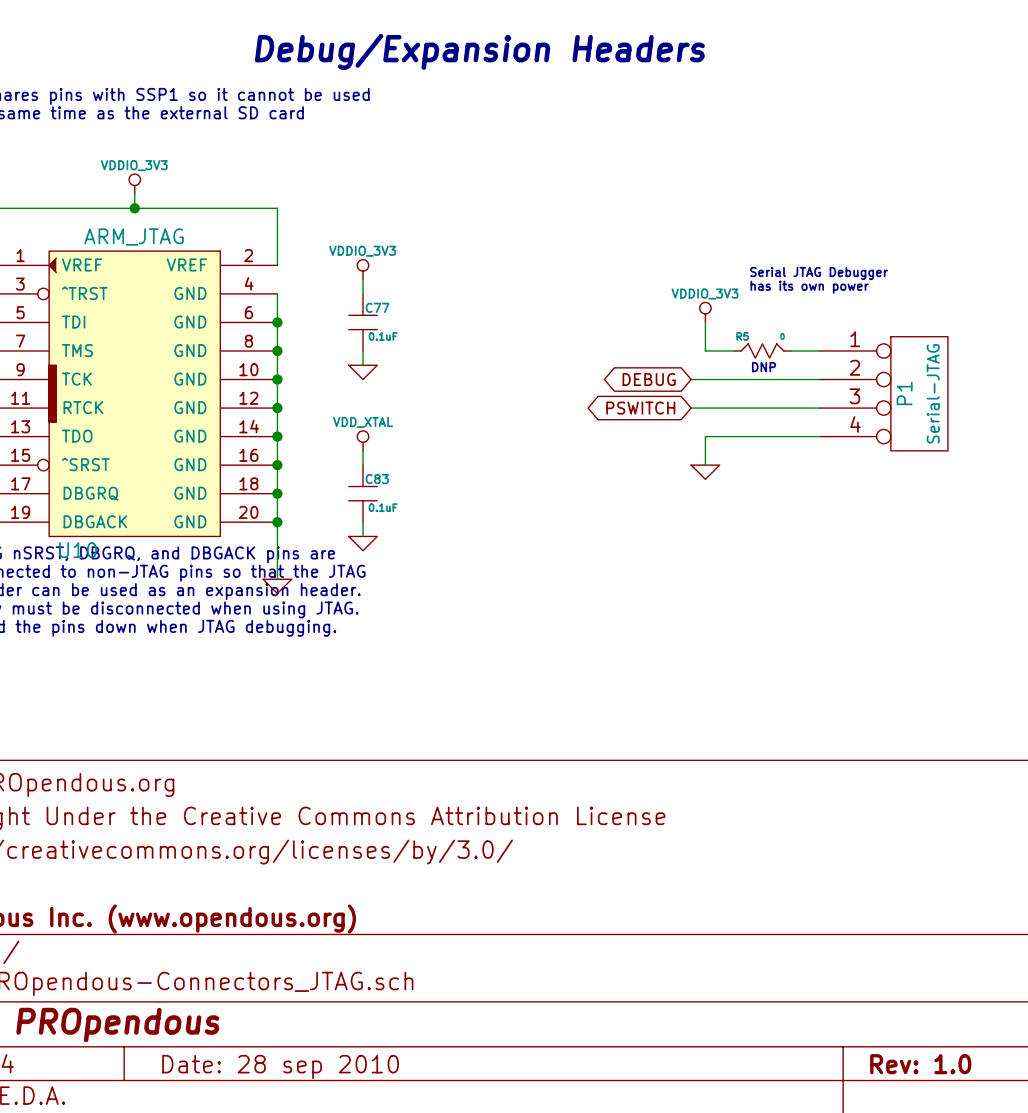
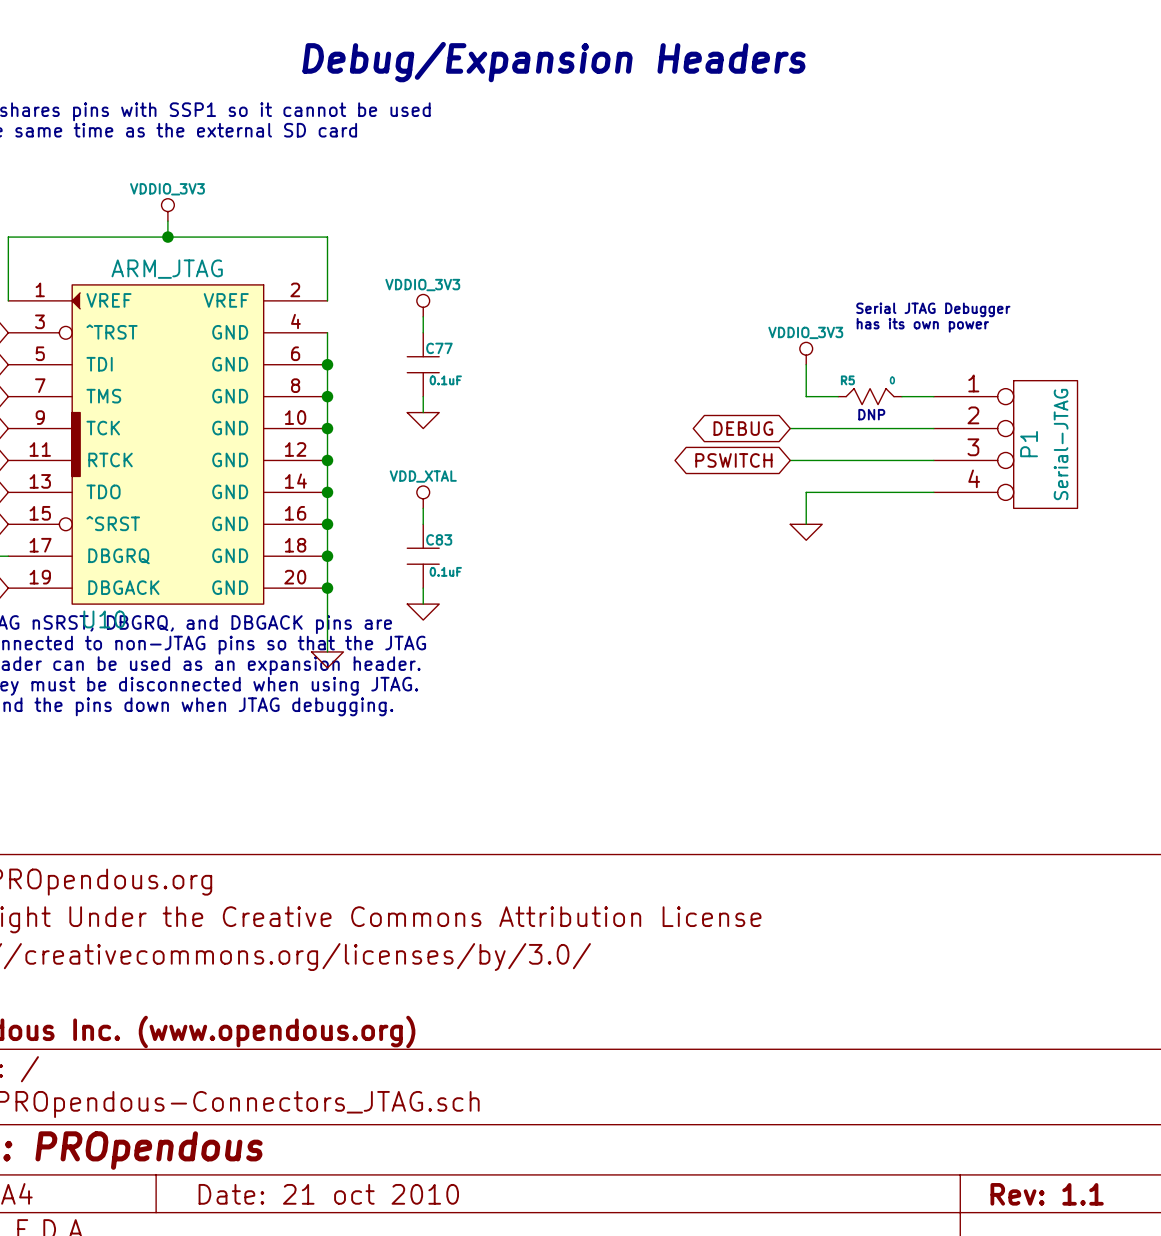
title block: Rev: 1.0 (920, 1064) -> Rev: 1.1 (1047, 1194)
title block: Date: 28 sep 2010 (280, 1066) -> Date: 21 oct 2010 (328, 1194)

